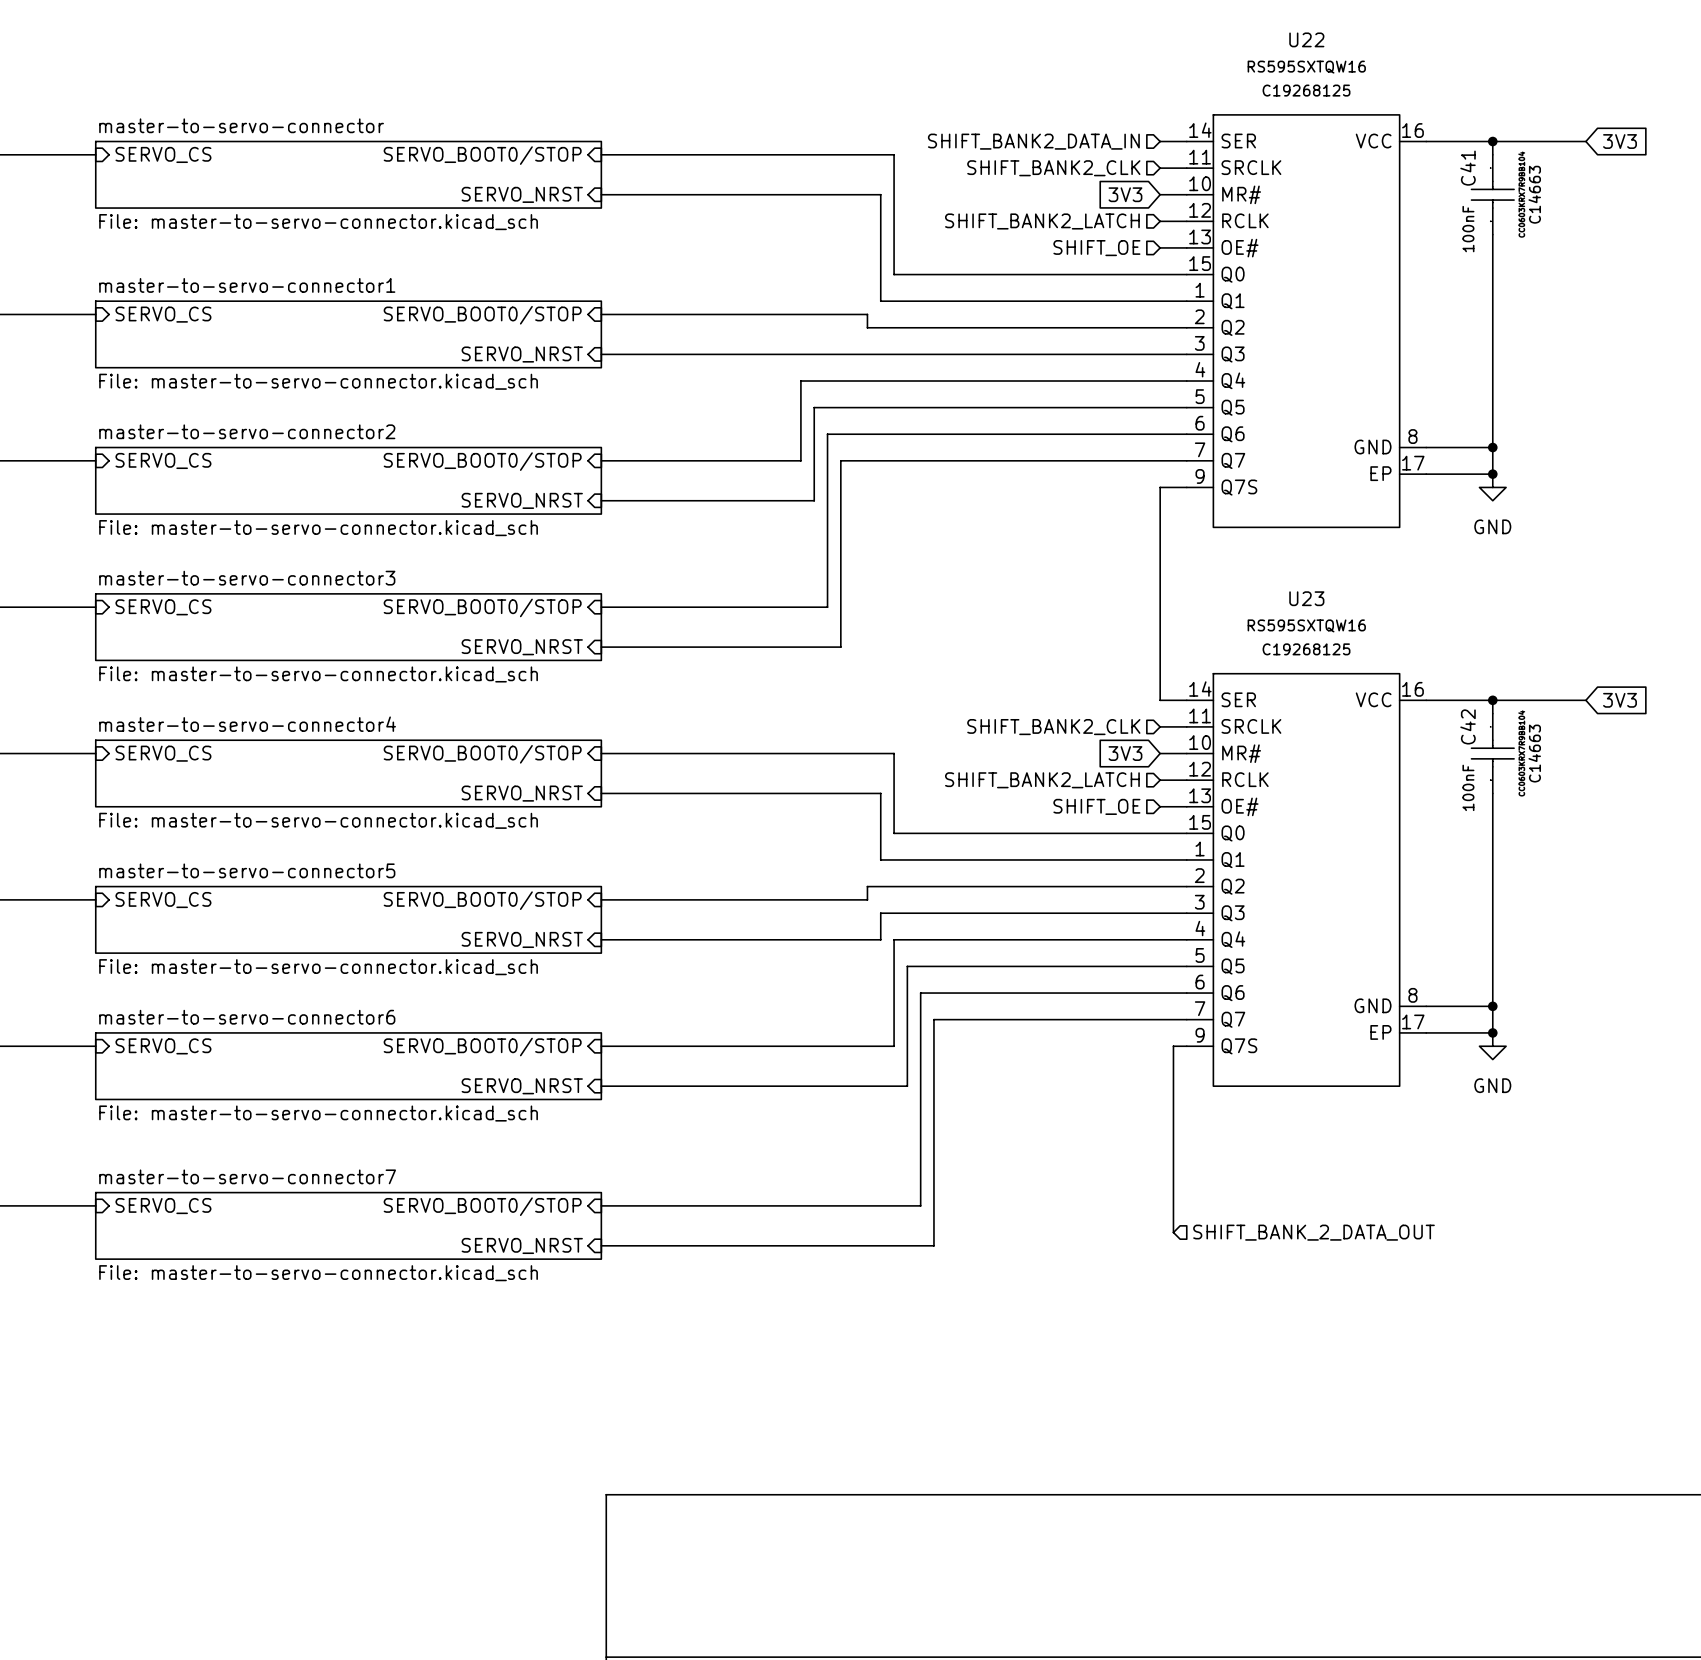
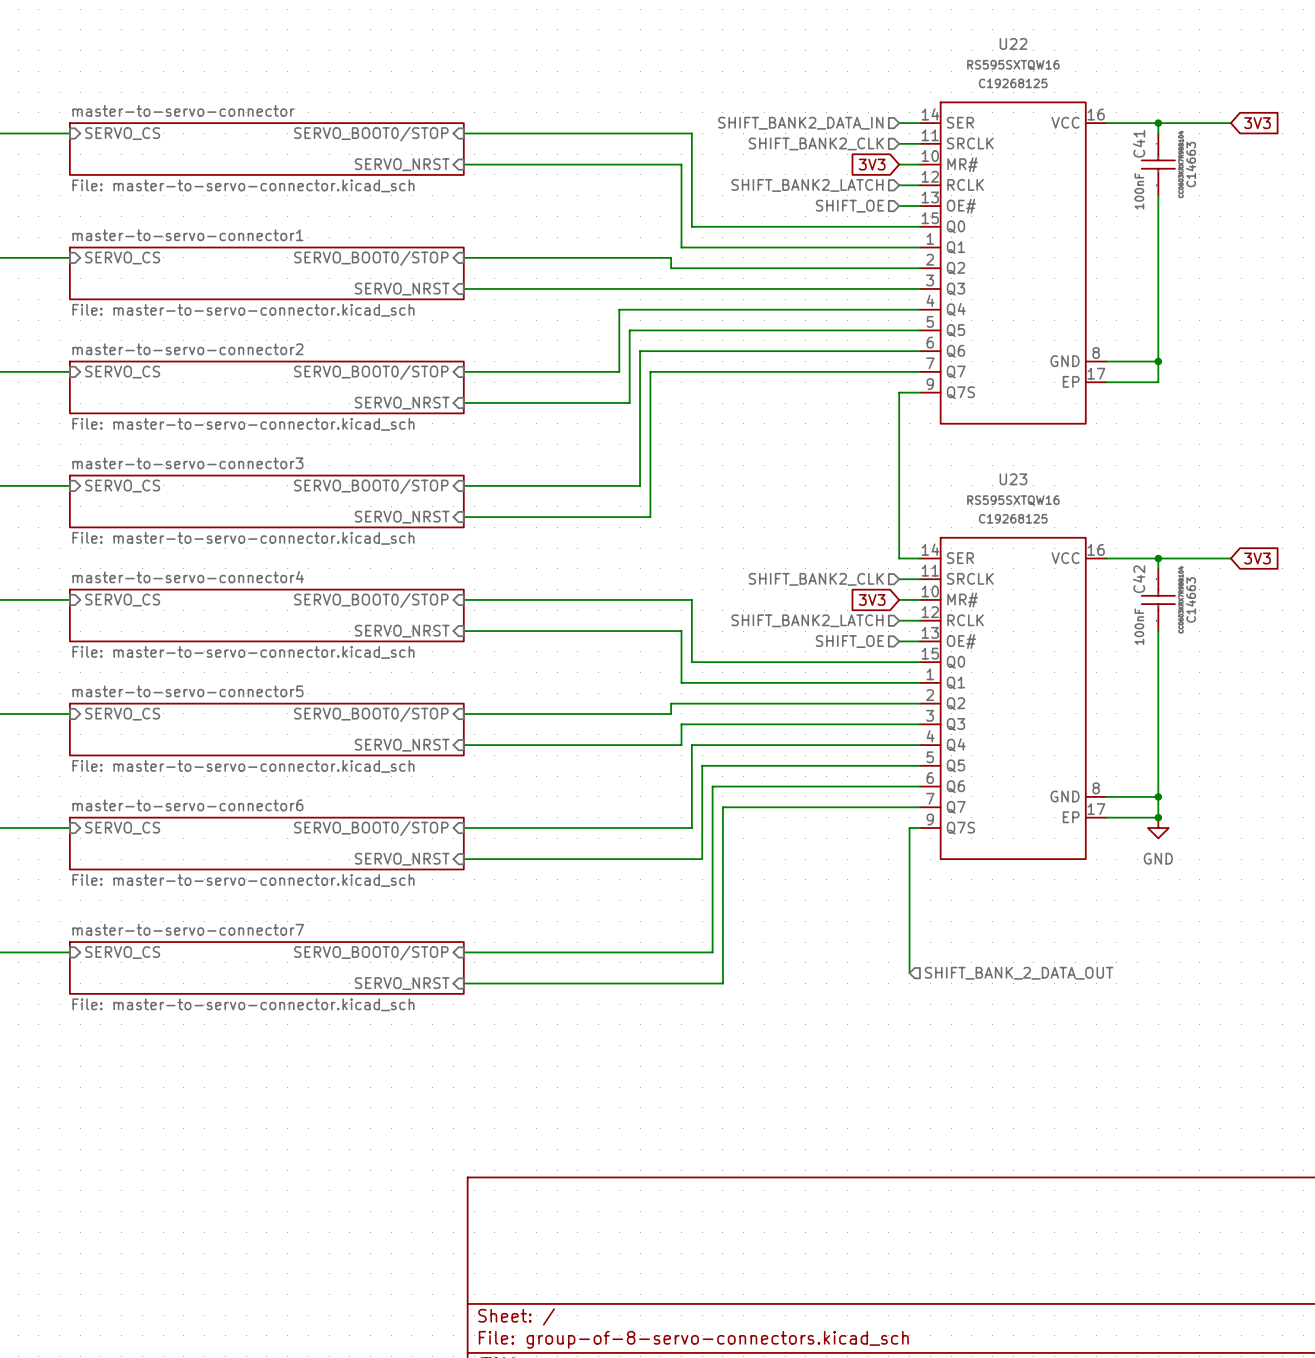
junction: (1492, 474) -> none
power symbol: GND (1492, 487) -> none

